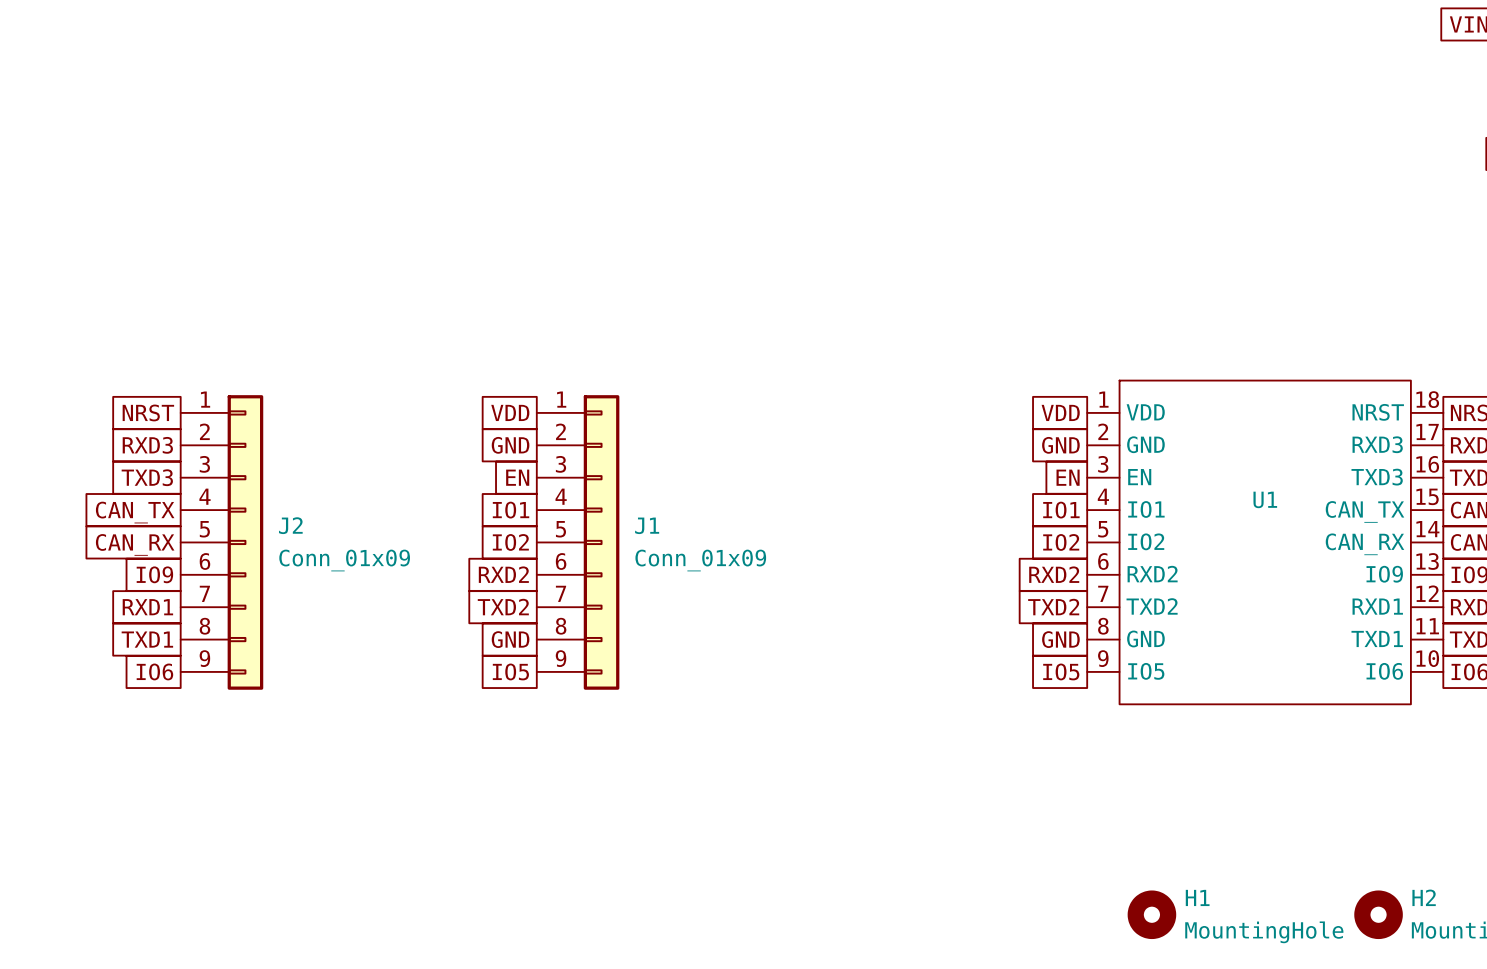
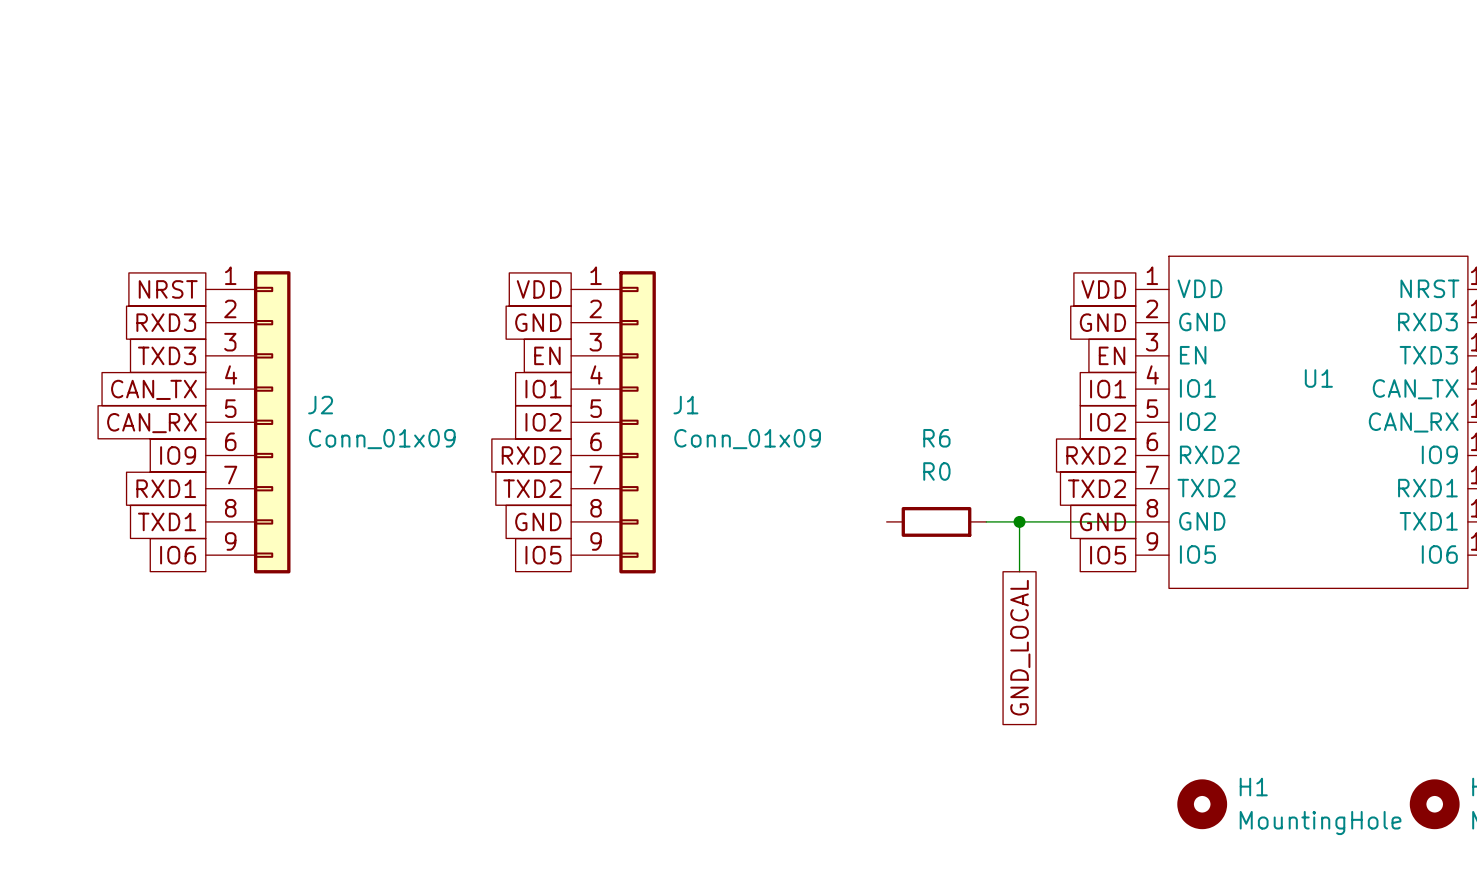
R6: none -> R0 (936, 521)
wire: none -> (986, 521) (1135, 521)
wire: none -> (1019, 521) (1019, 571)
junction: none -> (1019, 521)
global label: none -> GND_LOCAL (1020, 647)

